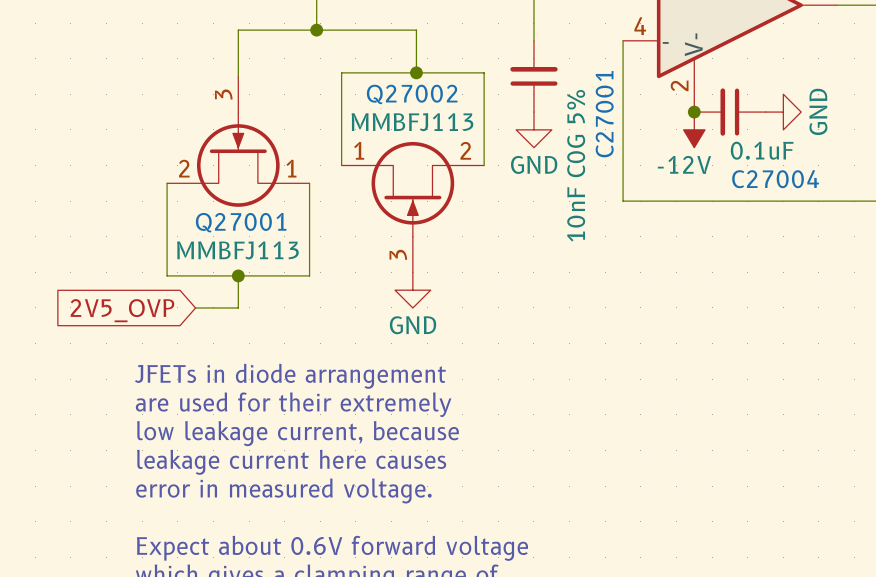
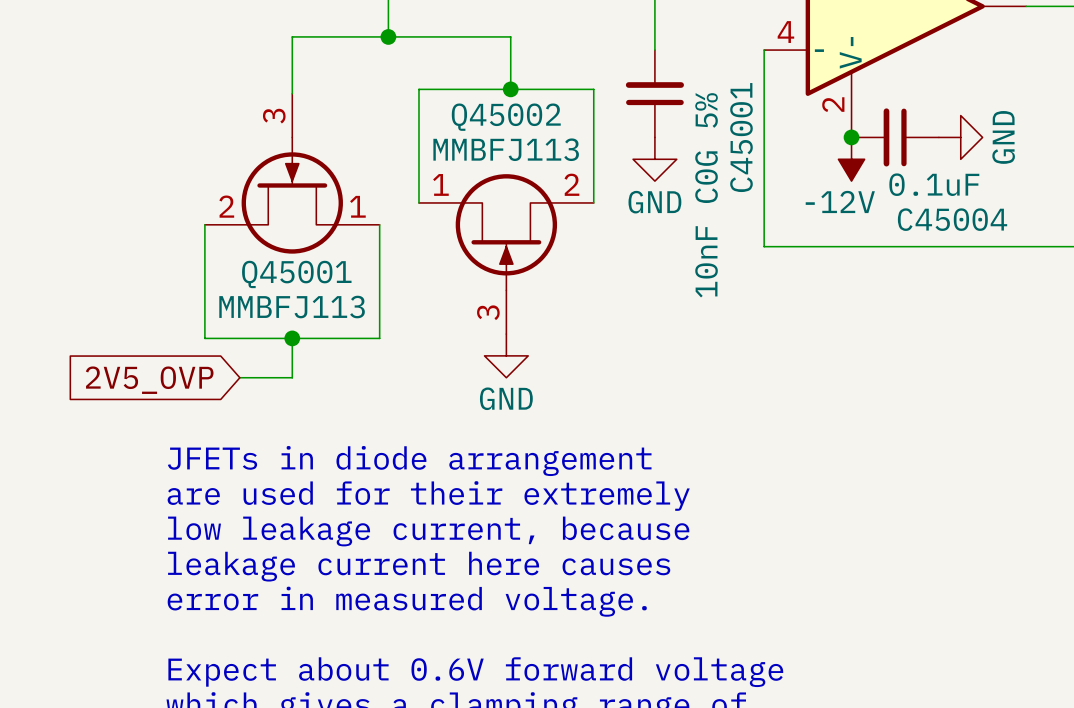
Q27002 name: Q27002 (412, 94) -> Q45002 (506, 117)
C27001 name: C27001 (604, 114) -> C45001 (741, 137)
C27004 name: C27004 (775, 179) -> C45004 (952, 219)
Q27001 name: Q27001 (241, 222) -> Q45001 (296, 274)

